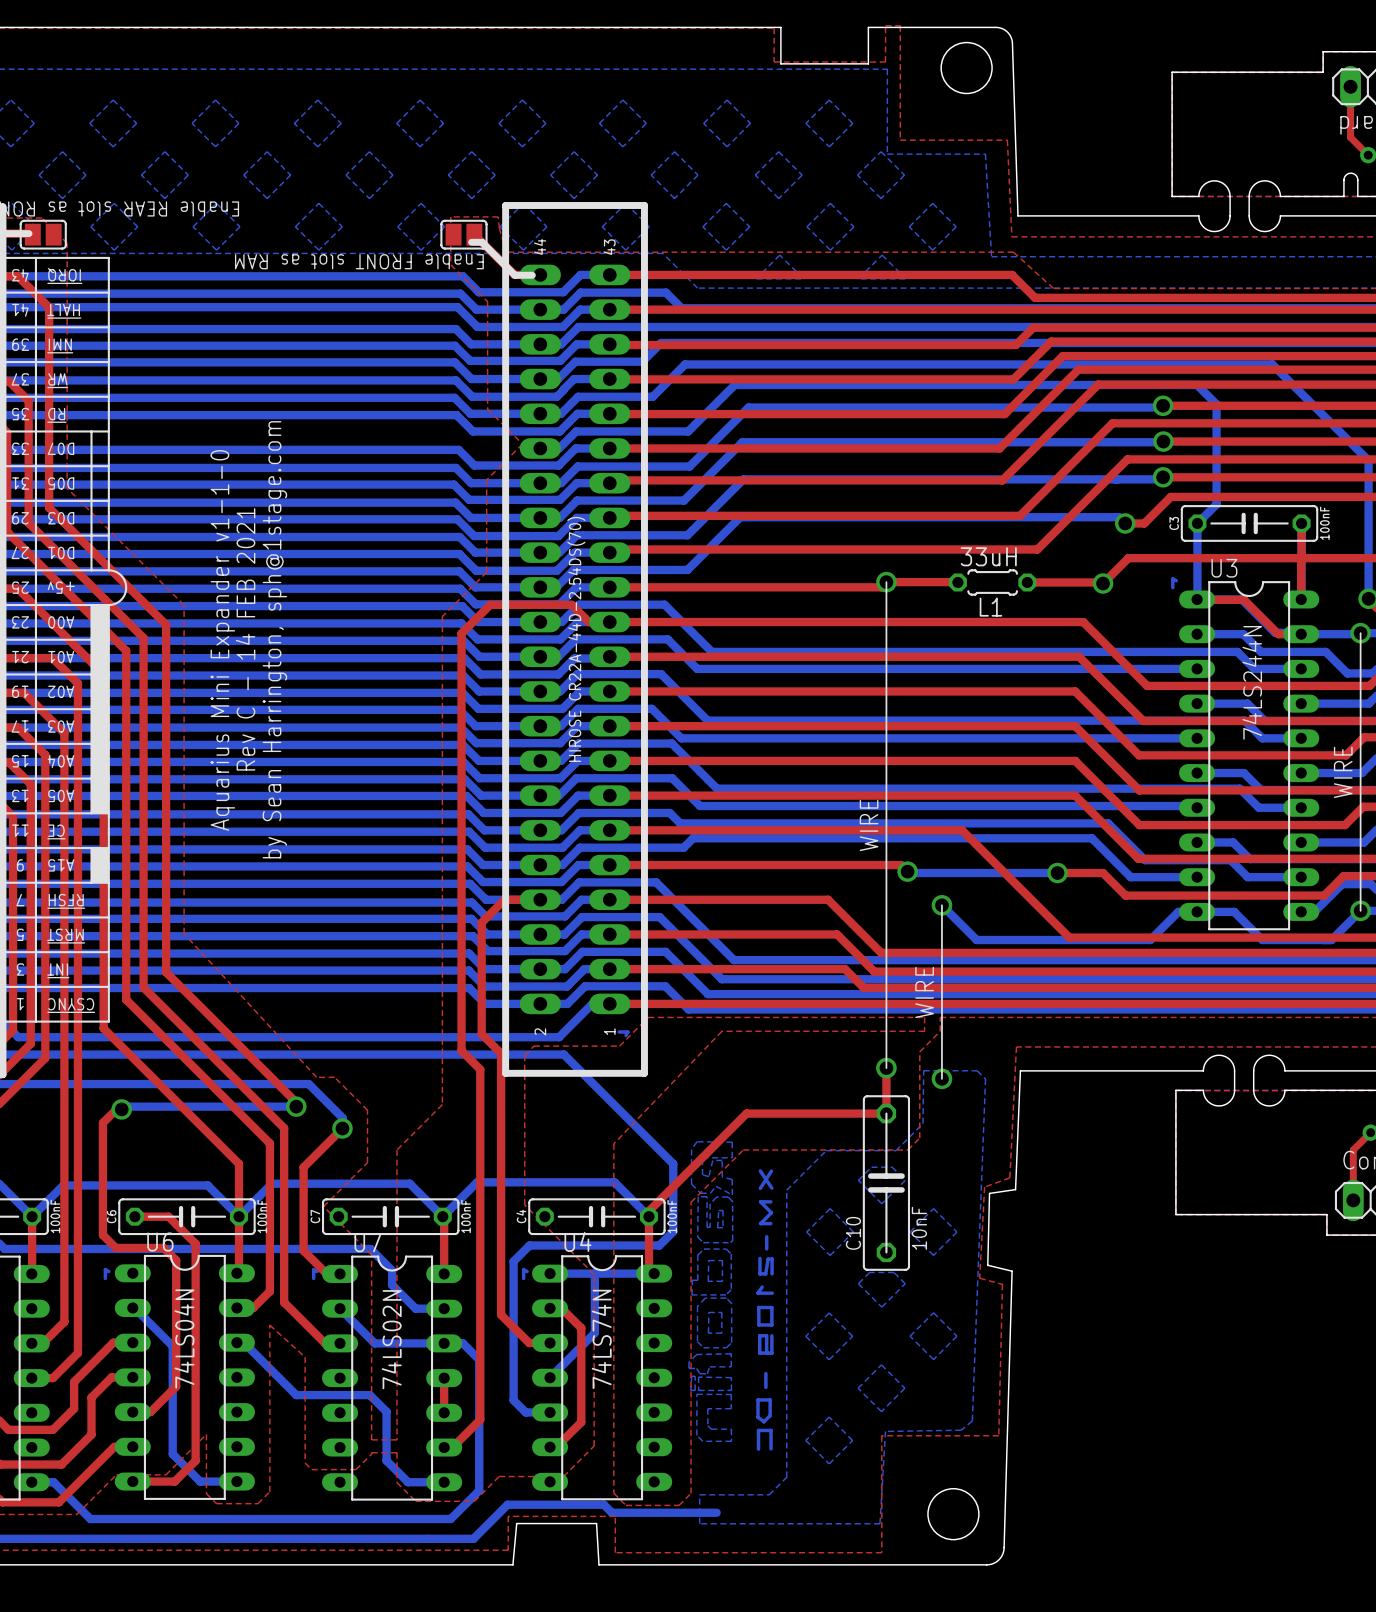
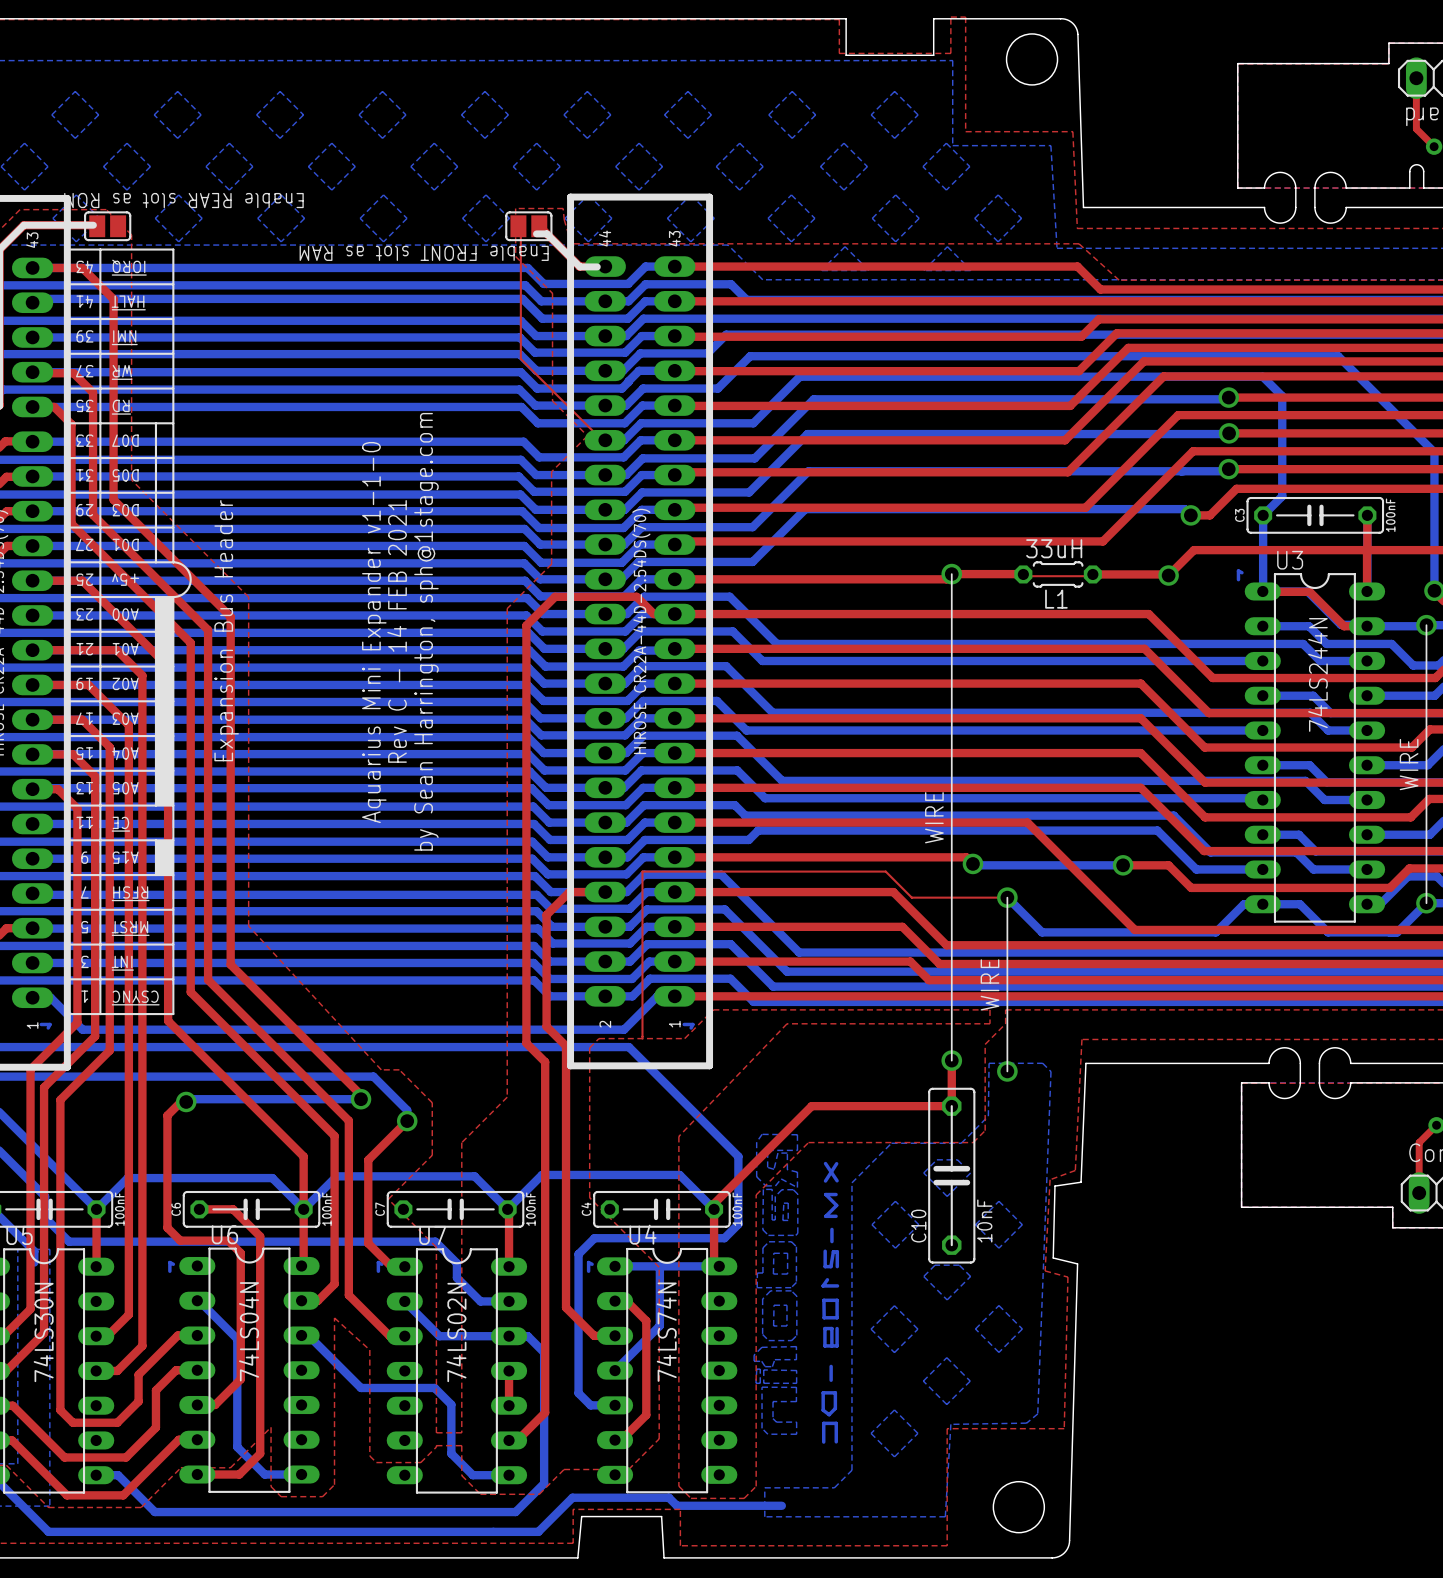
top track: none -> (518, 226) (520, 228) (520, 359) (599, 437) (605, 440)
top track: none -> (1023, 574) (1024, 576) (1085, 576) (1092, 574)
text: none -> Expansion Bus Header (226, 630)
text position: Rev C - 14 FEB 2021 (245, 639) -> Rev C - 14 FEB 2021 (397, 631)
text position: by Sean Harrington, sph@1stage.com (274, 639) -> by Sean Harrington, sph@1stage.com (426, 631)
text position: Aquarius Mini Expander v1-1-0 (222, 640) -> Aquarius Mini Expander v1-1-0 (374, 632)
top track: none -> (1007, 897) (911, 897) (885, 871) (642, 871) (642, 1038)

